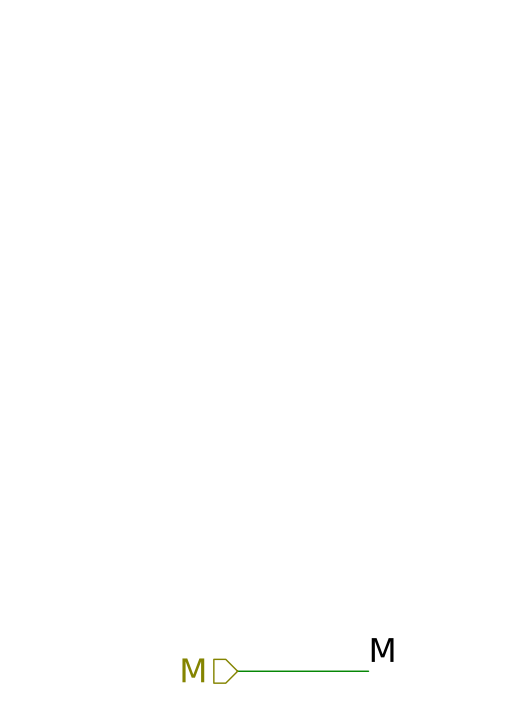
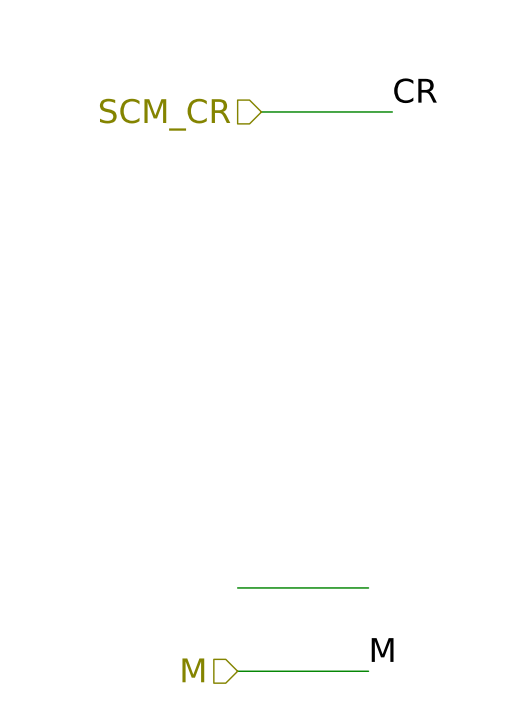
label: none -> CR (415, 90)
wire: none -> (261, 111) (392, 111)
hierarchical label: none -> SCM_CR (165, 114)
wire: none -> (237, 587) (368, 587)

